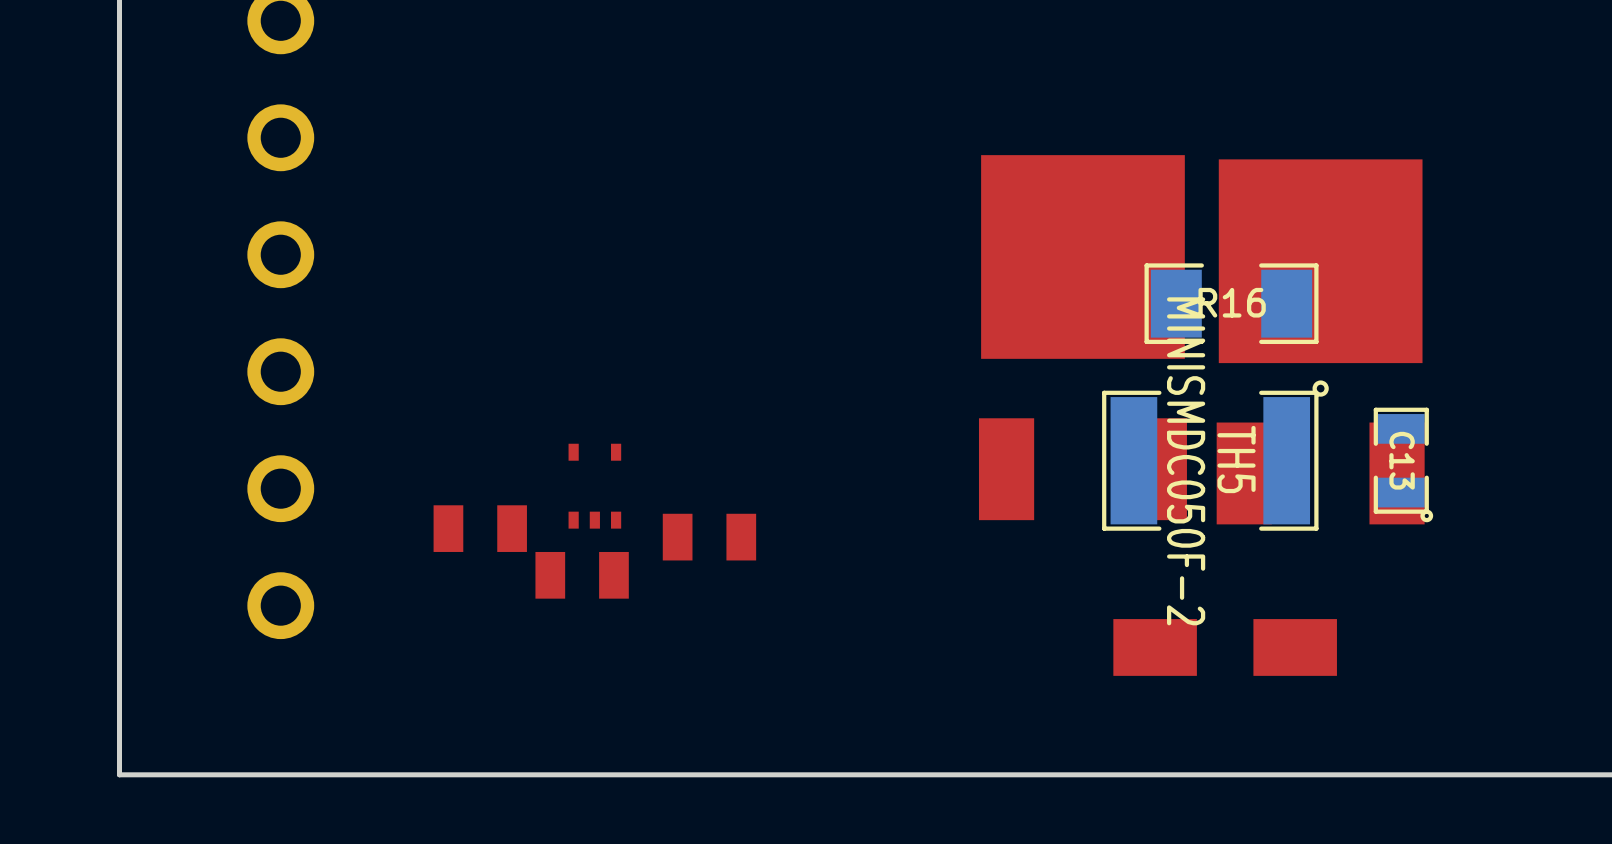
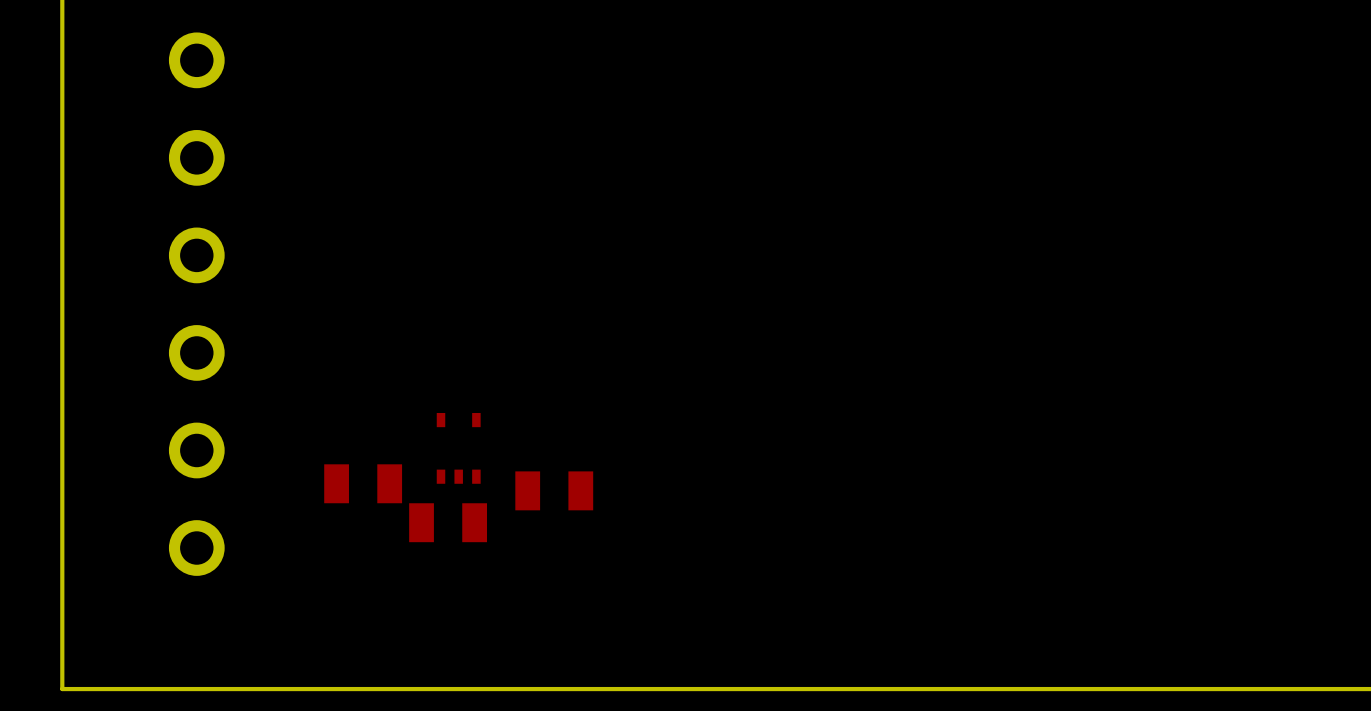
R16: (1231, 303) -> none
part: (1082, 337) -> none
part: (1320, 341) -> none
TH5: MINISMDC050F-2 (1215, 455) -> none
C13: (1403, 464) -> none
part: (1225, 647) -> none

